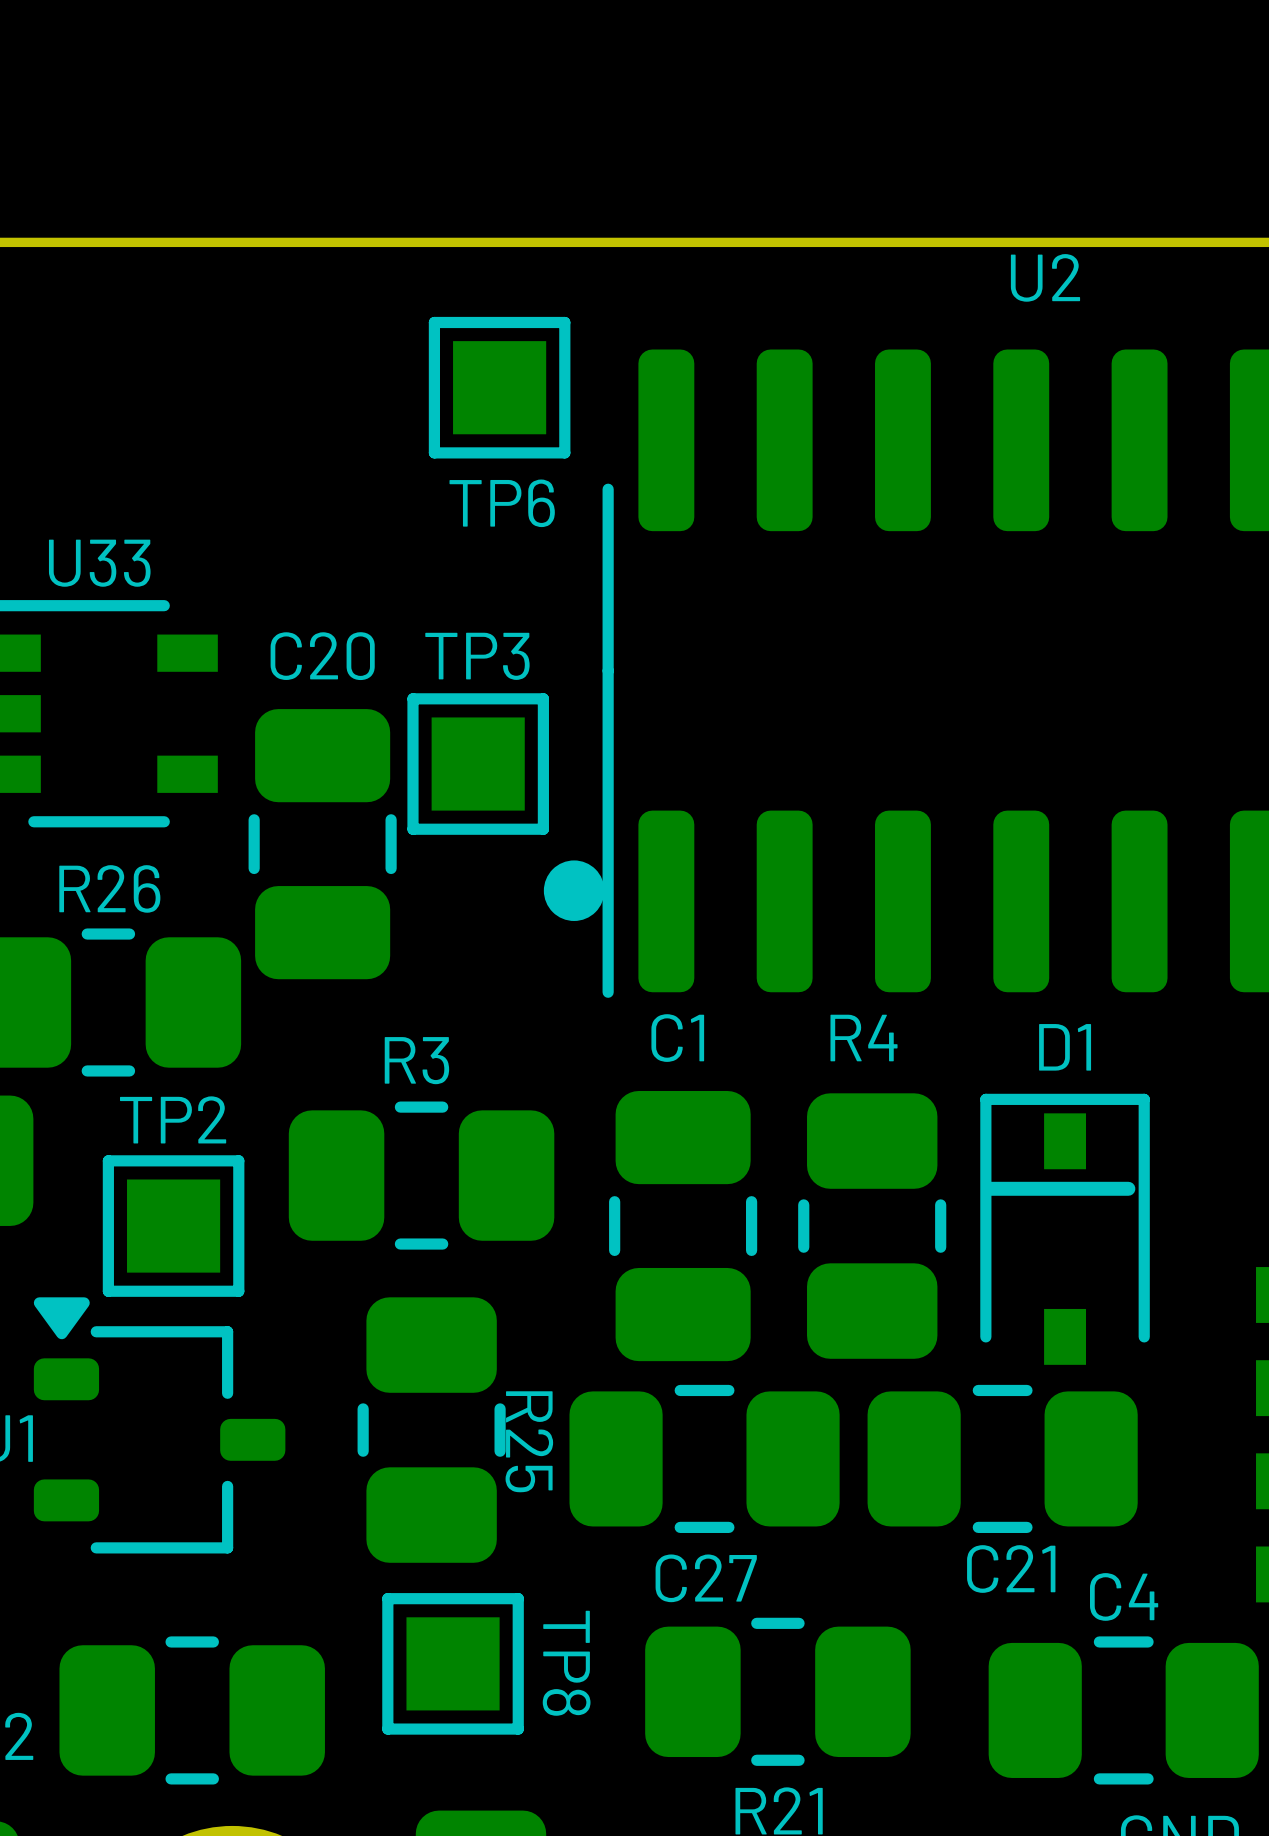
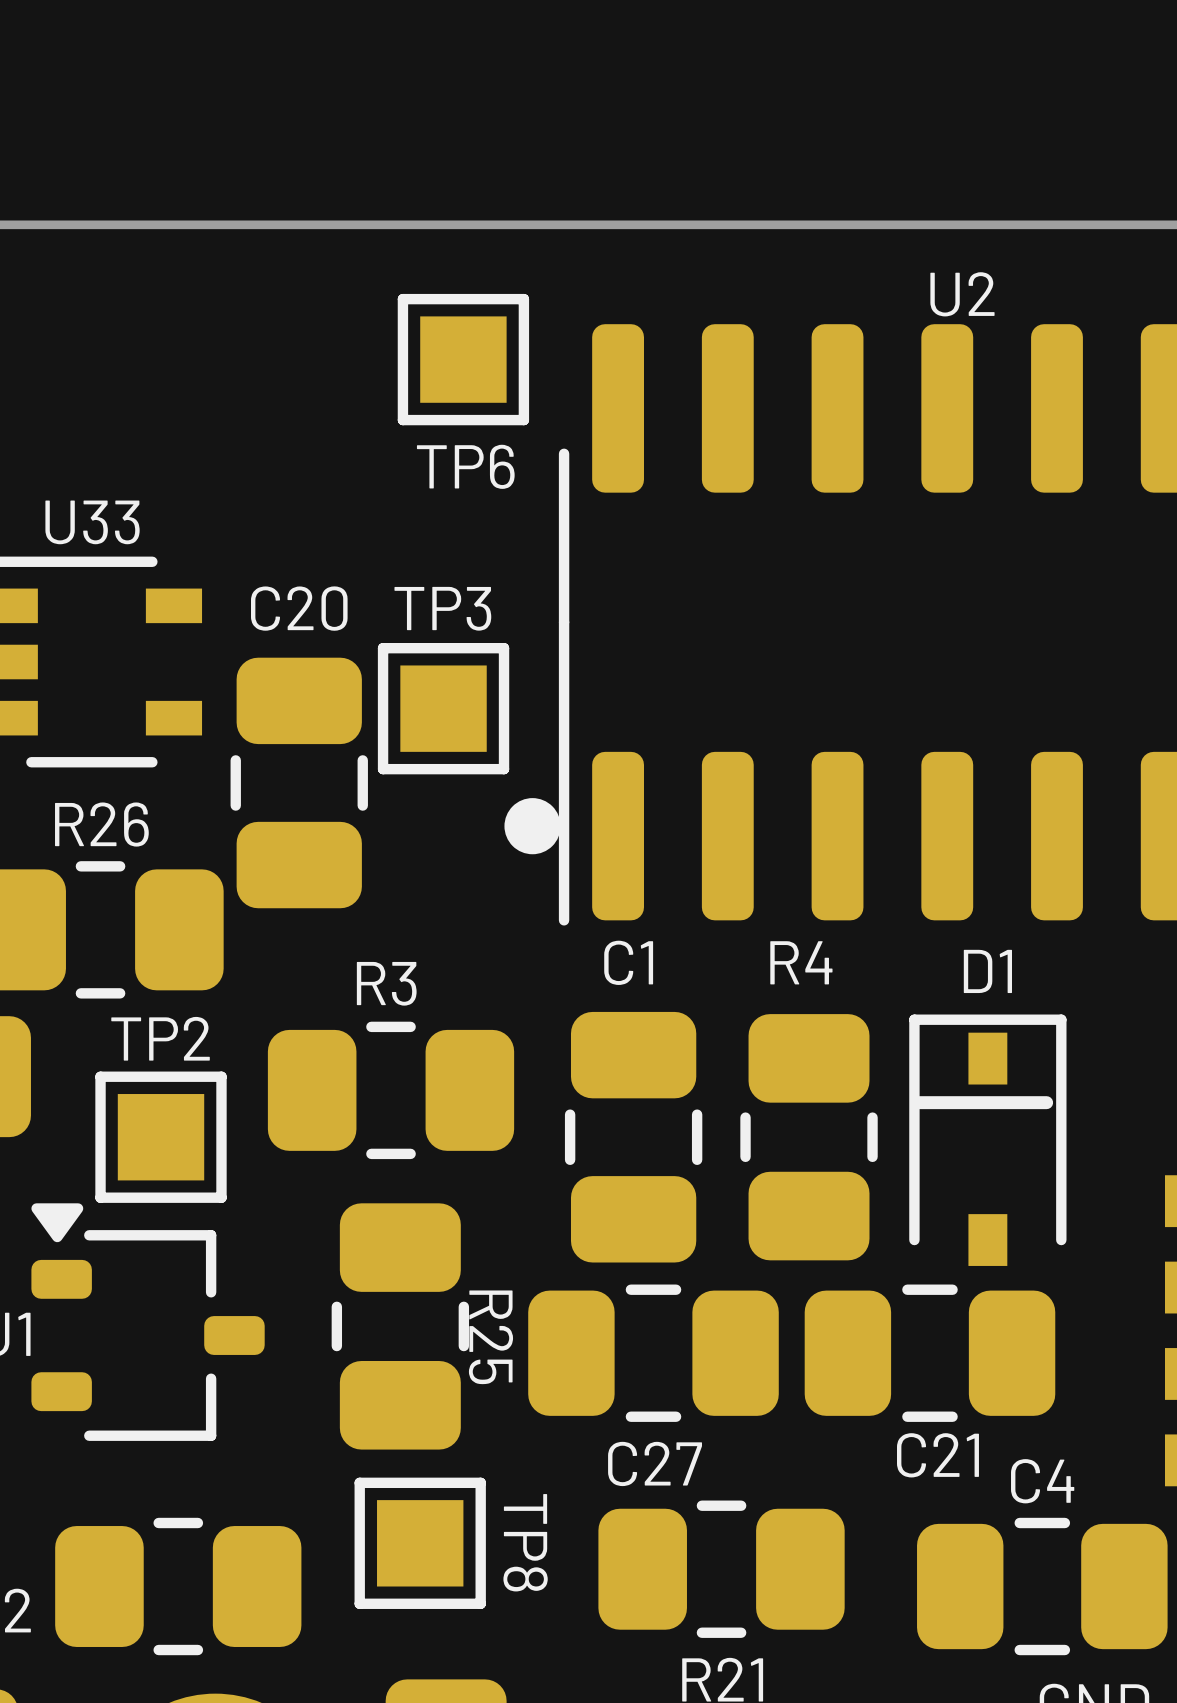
U2 name position: U2 (1045, 277) -> U2 (962, 294)

